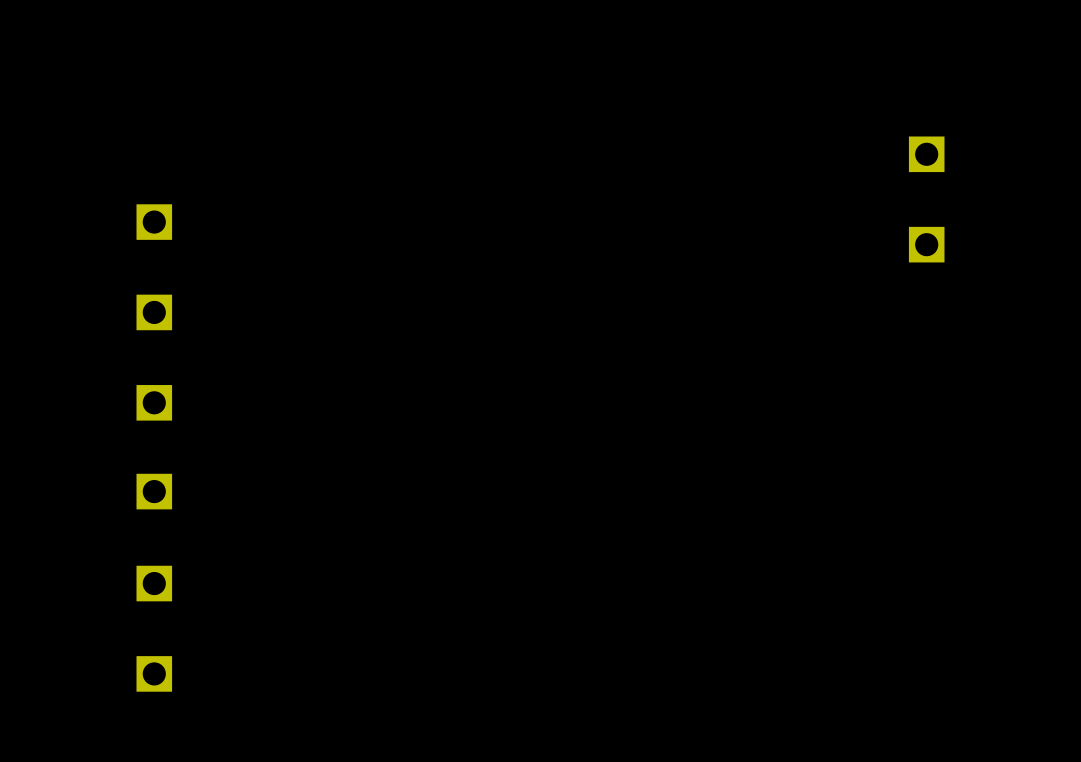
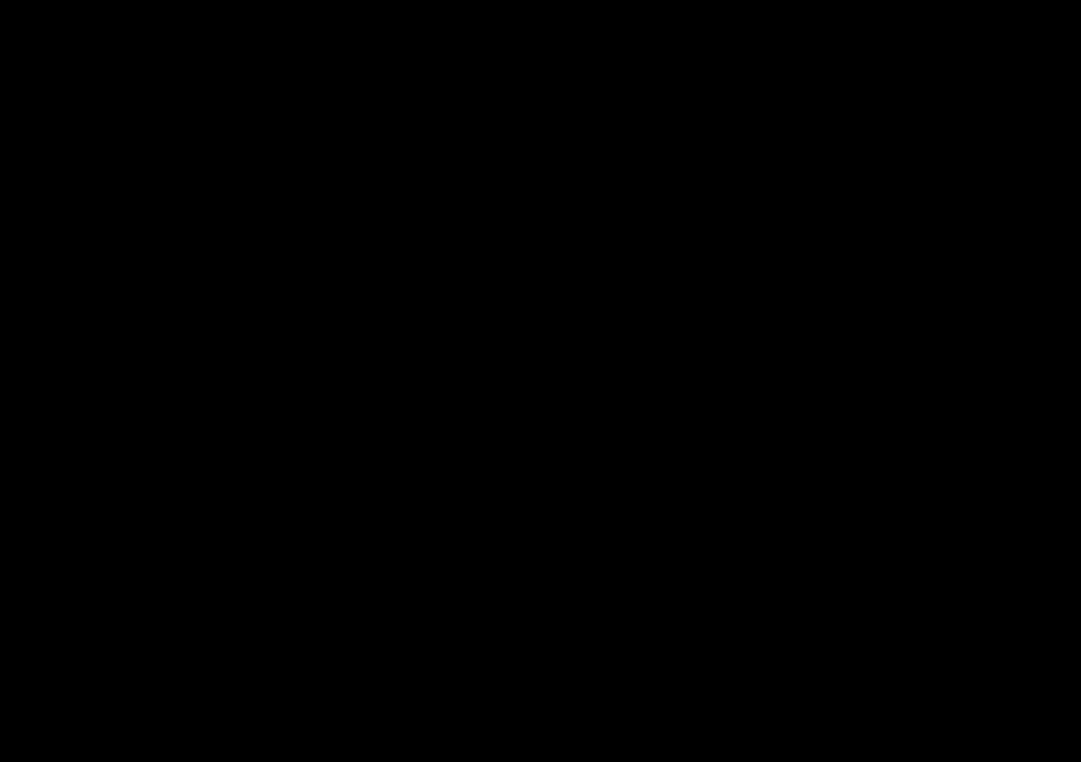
part: (926, 154) -> none
part: (154, 222) -> none
part: (926, 244) -> none
part: (154, 312) -> none
part: (154, 402) -> none
part: (154, 491) -> none
part: (154, 583) -> none
part: (154, 673) -> none

